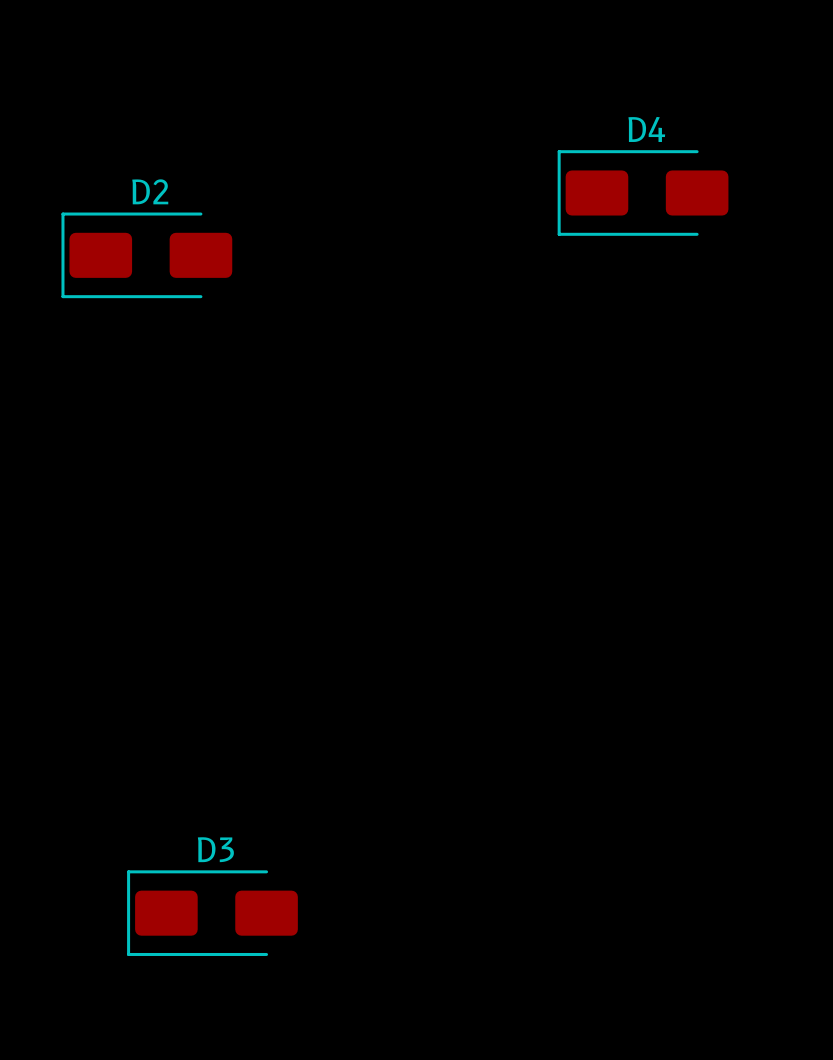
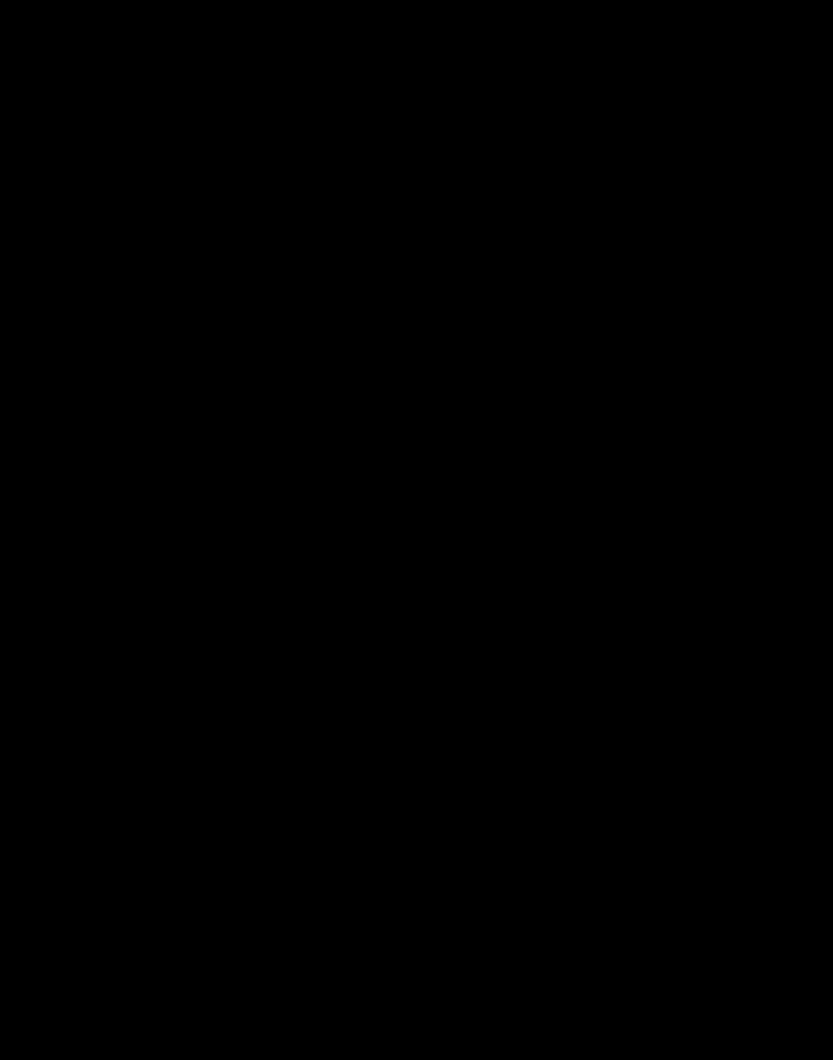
D4: (643, 192) -> none
D2: (146, 255) -> none
D3: (212, 913) -> none

